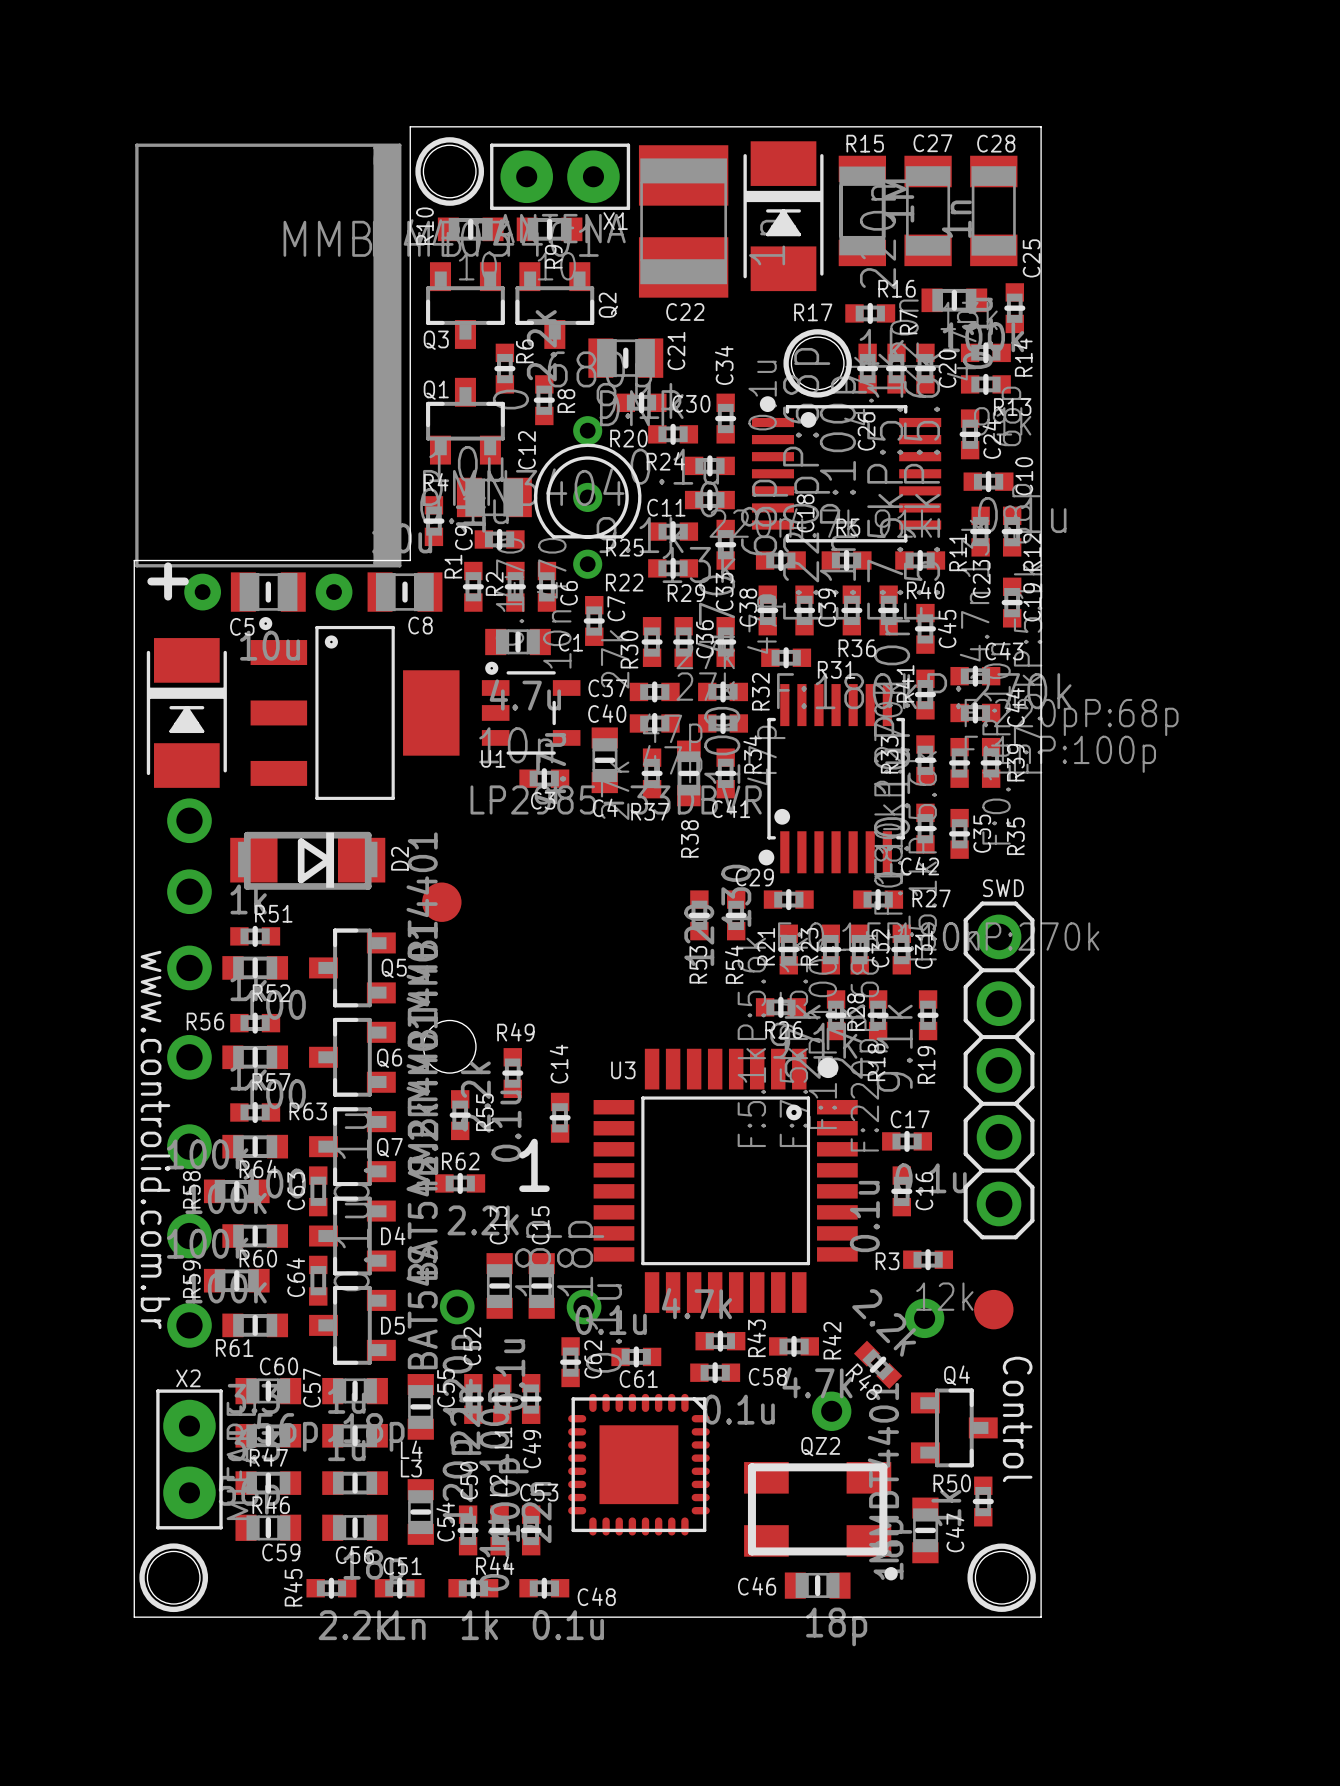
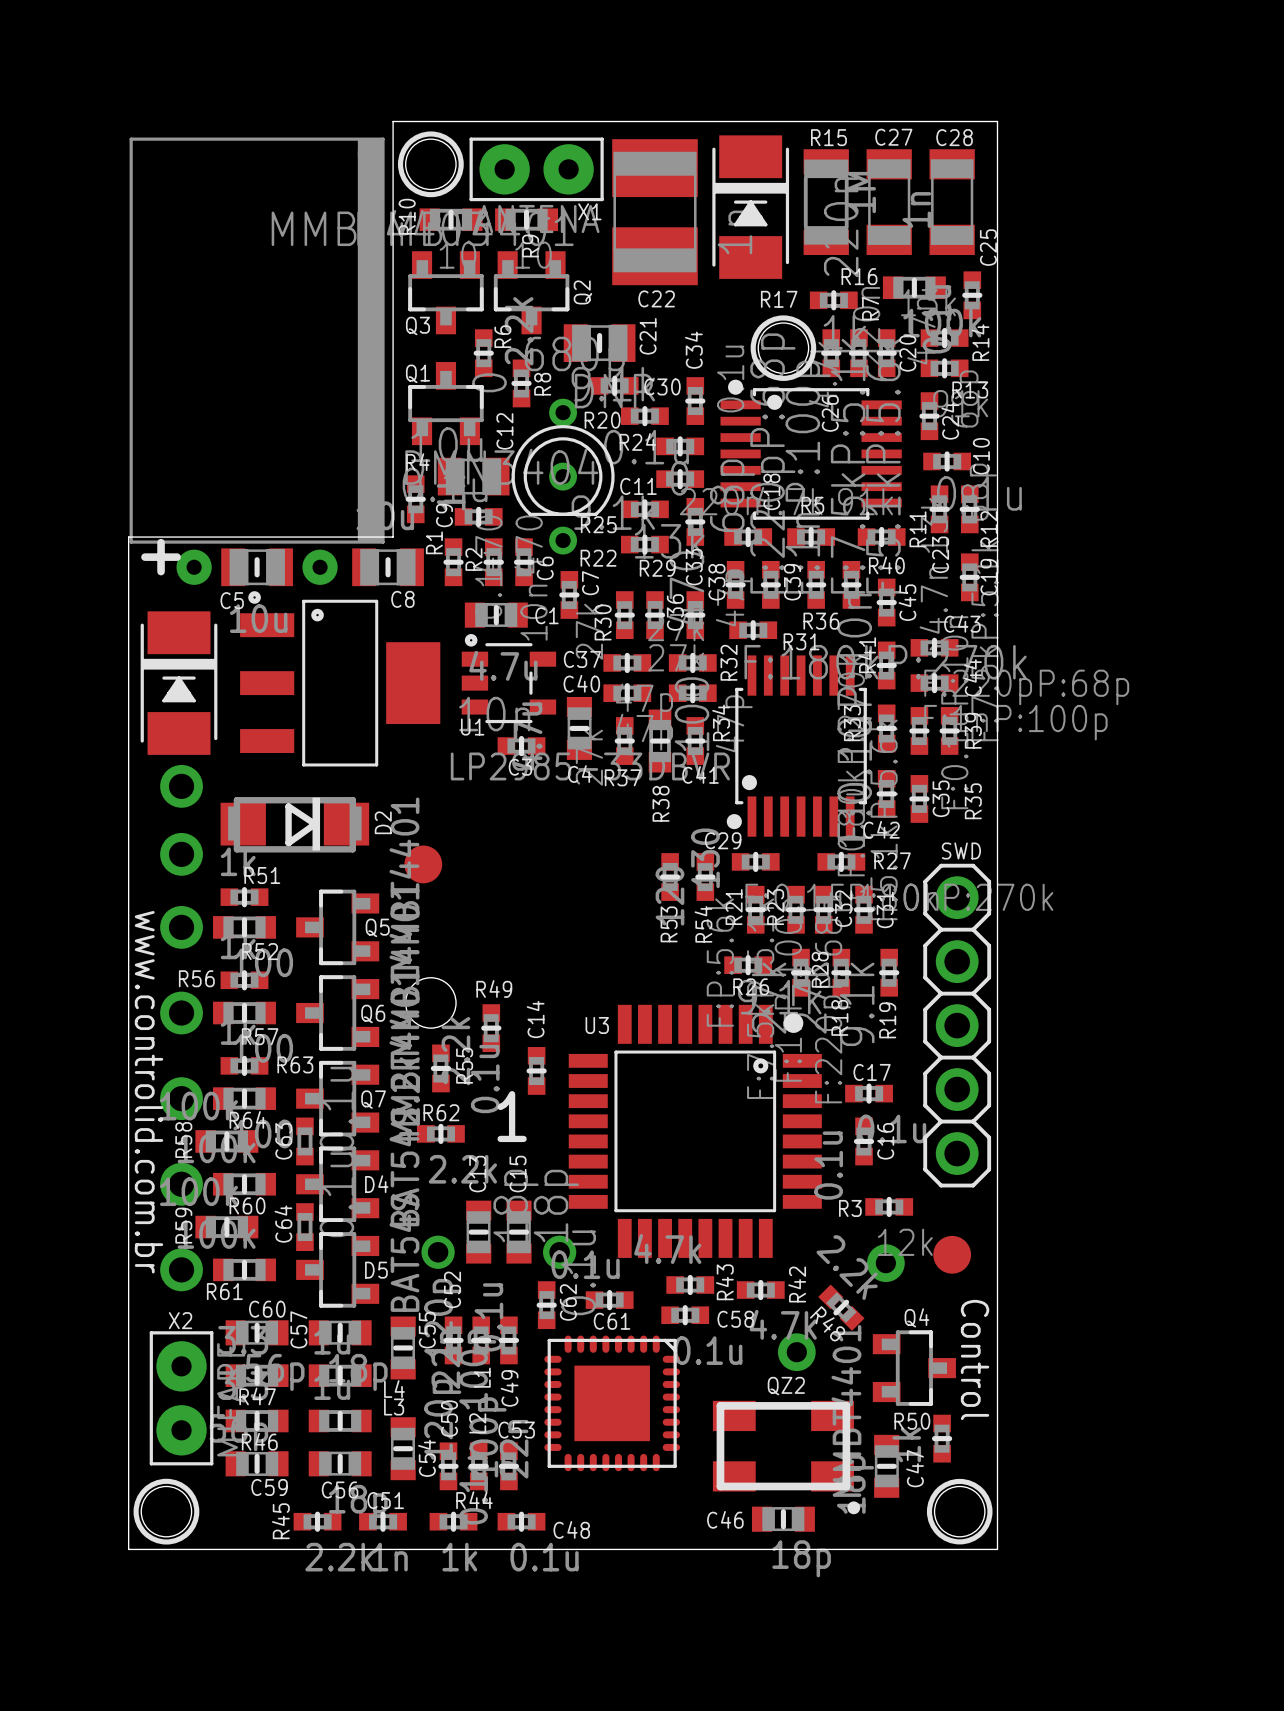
R21 value: F:5.1kP:5.6k (751, 1042) -> F:P:5.6k (720, 962)

